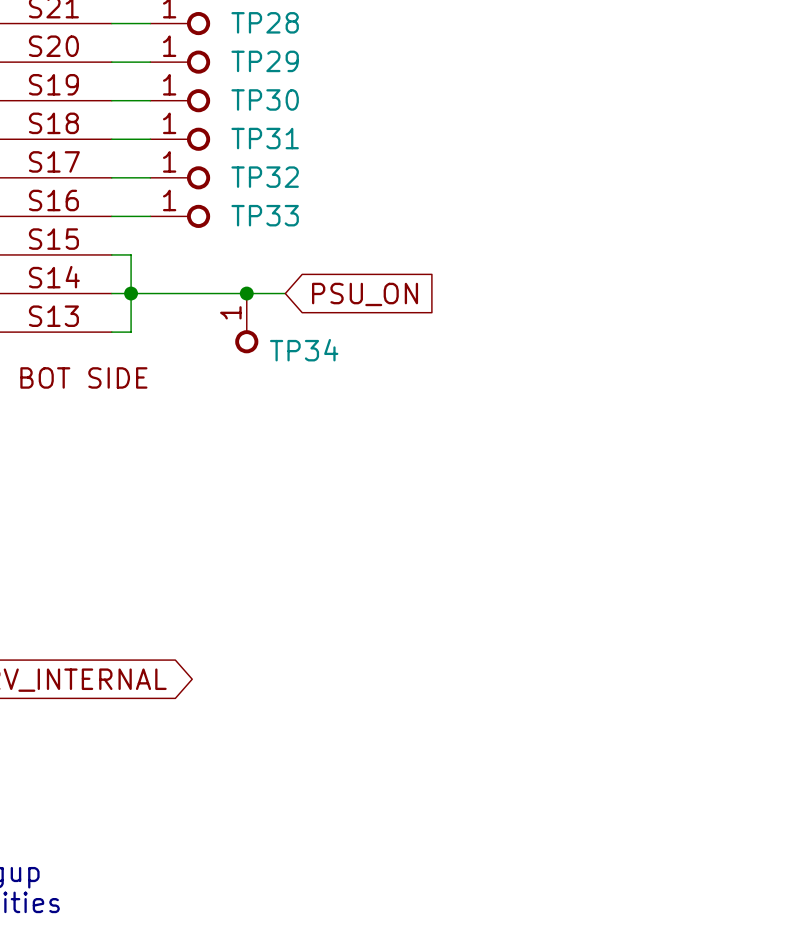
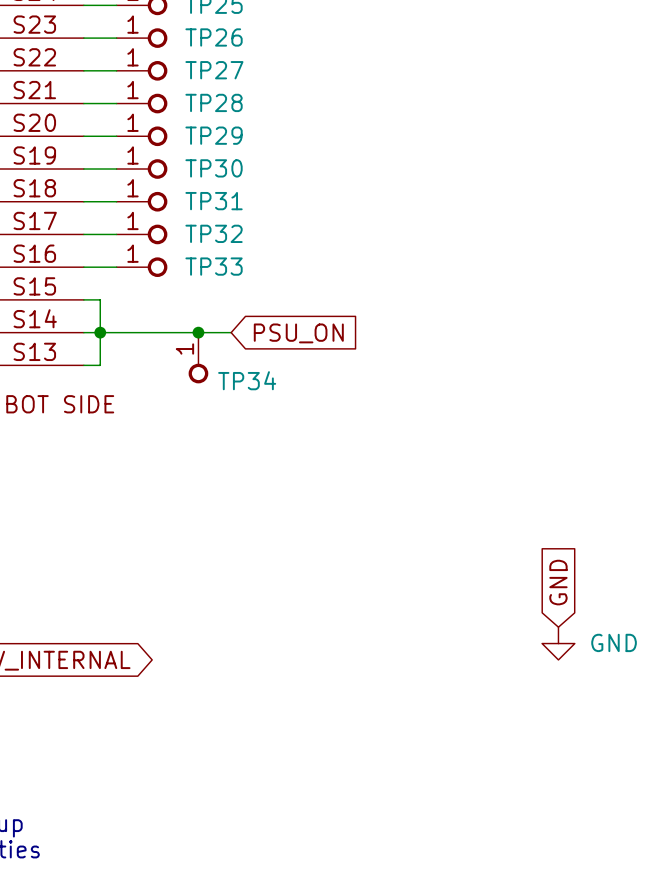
global label: none -> GND (558, 582)
power symbol: none -> GND (558, 643)

